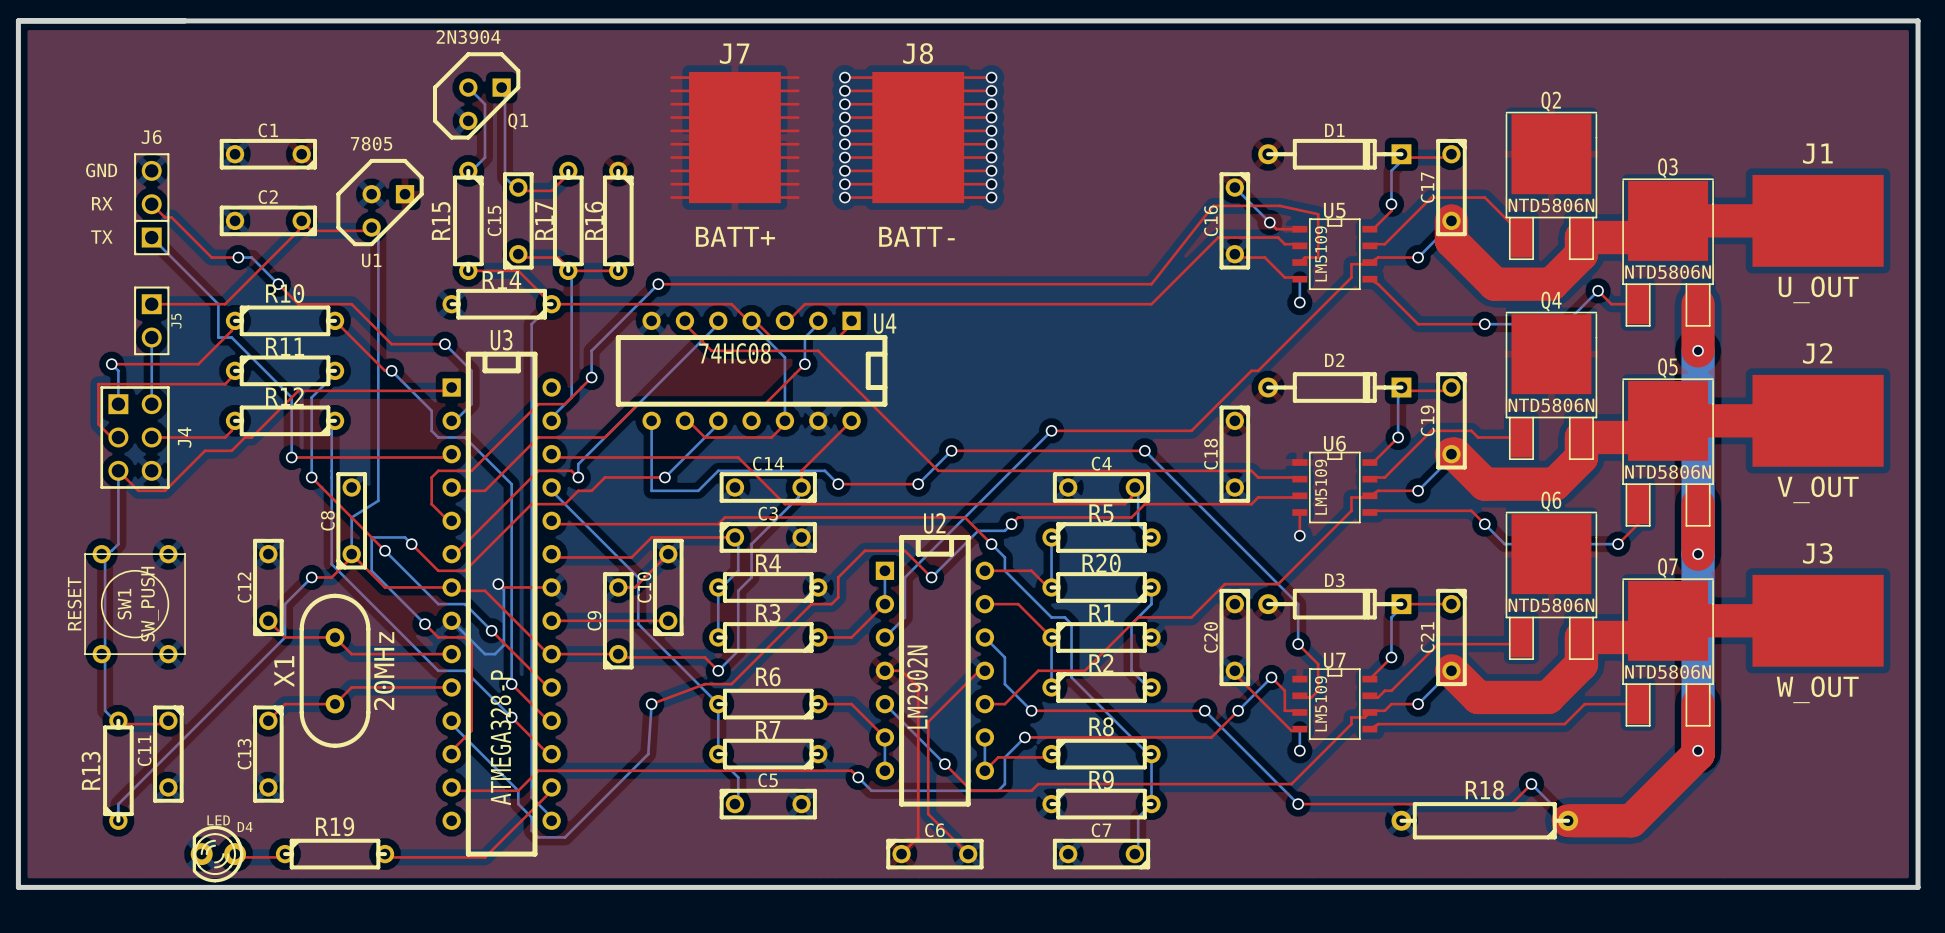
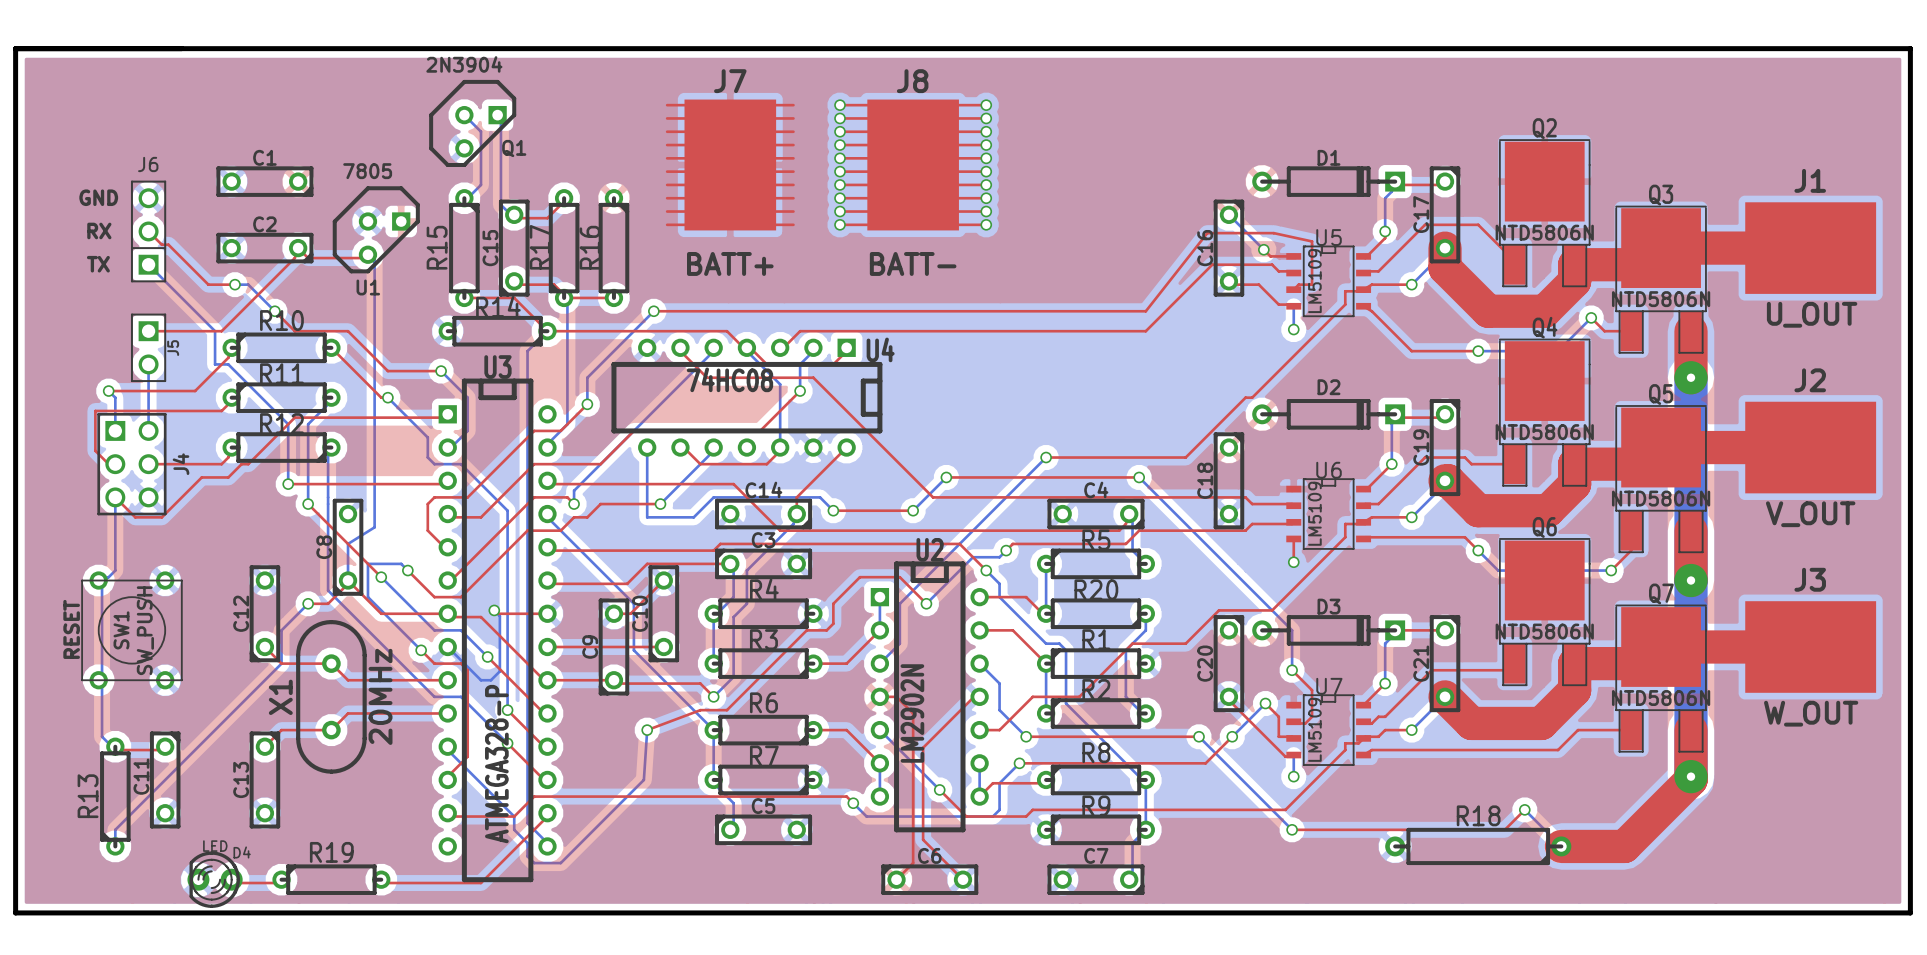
via size: [1692, 345, 1704, 357] -> [1674, 361, 1708, 395]
via size: [1692, 548, 1704, 560] -> [1674, 563, 1708, 598]
via size: [1692, 744, 1704, 757] -> [1674, 760, 1708, 794]

